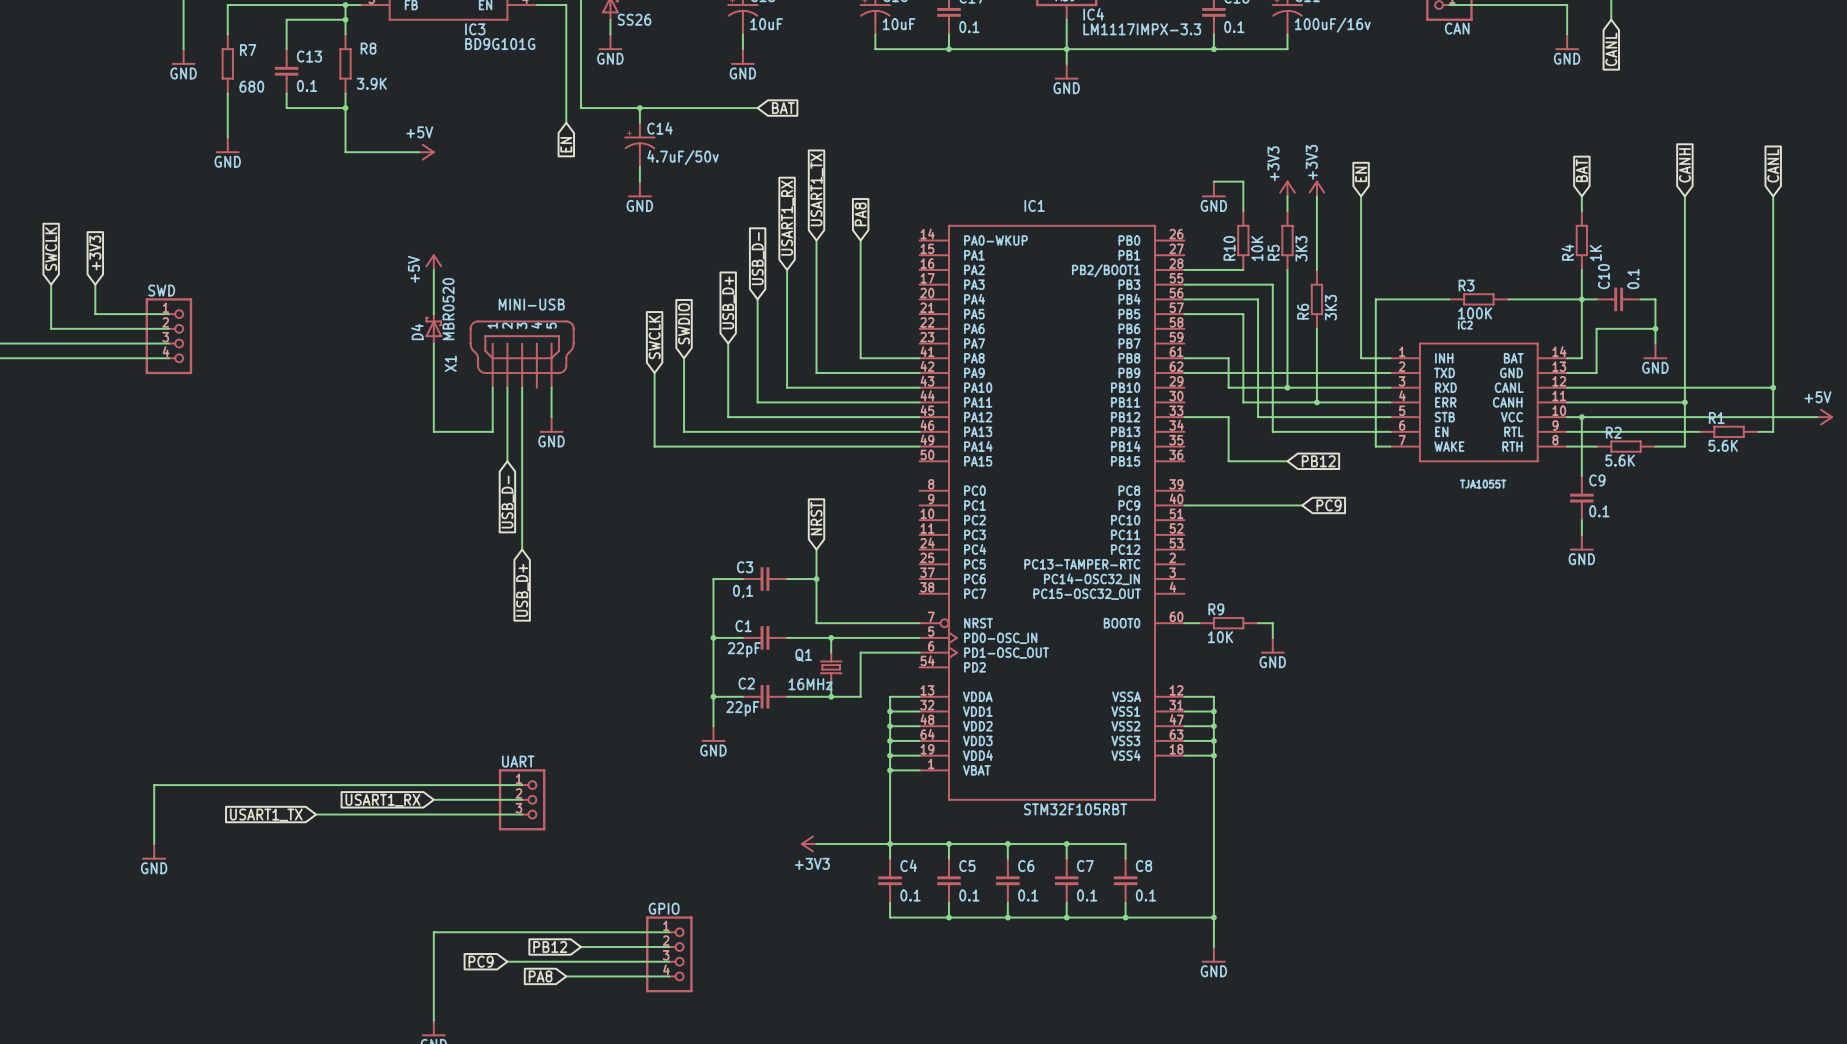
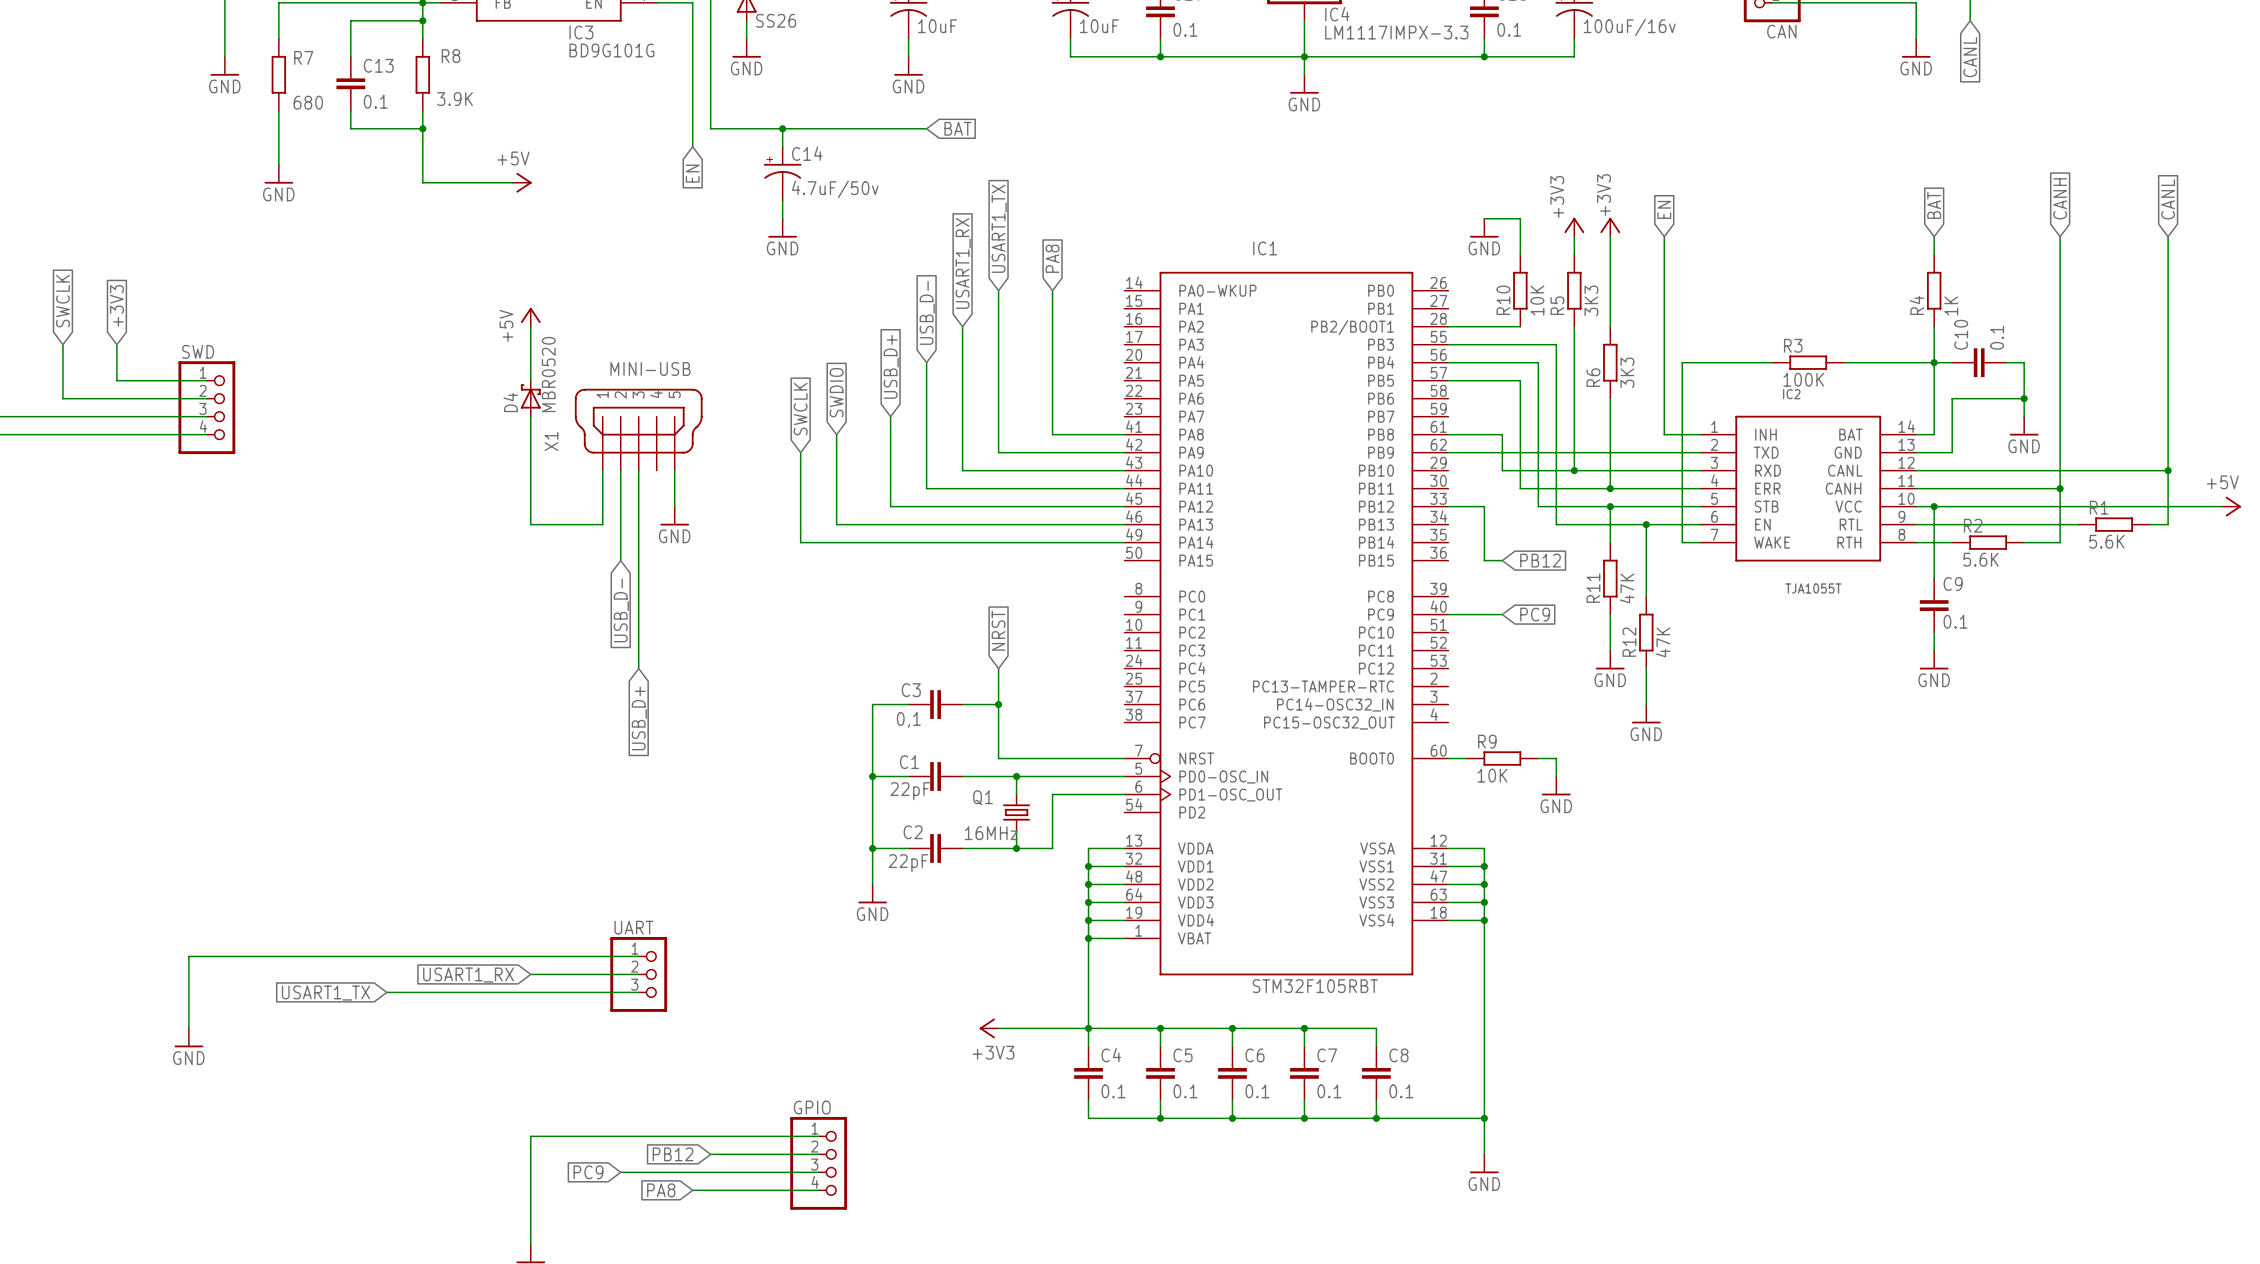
wire: (1213, 417) (1228, 417) (1228, 461) (1287, 461) -> (1484, 506) (1484, 560) (1502, 560)
wire: none -> (1610, 506) (1610, 542)
junction: none -> (1610, 506)
wire: none -> (1646, 524) (1646, 596)
junction: none -> (1646, 524)
global label position: PB12 (1318, 461) -> PB12 (1540, 560)
R11: none -> 47K (1610, 578)
wire: (1228, 505) (1302, 505) -> none
wire: none -> (1610, 614) (1610, 650)
global label position: PC9 (1329, 505) -> PC9 (1535, 614)
R12: none -> 47K (1646, 632)
power symbol: none -> GND (1610, 660)
wire: none -> (1646, 668) (1646, 704)
power symbol: none -> GND (1646, 713)

